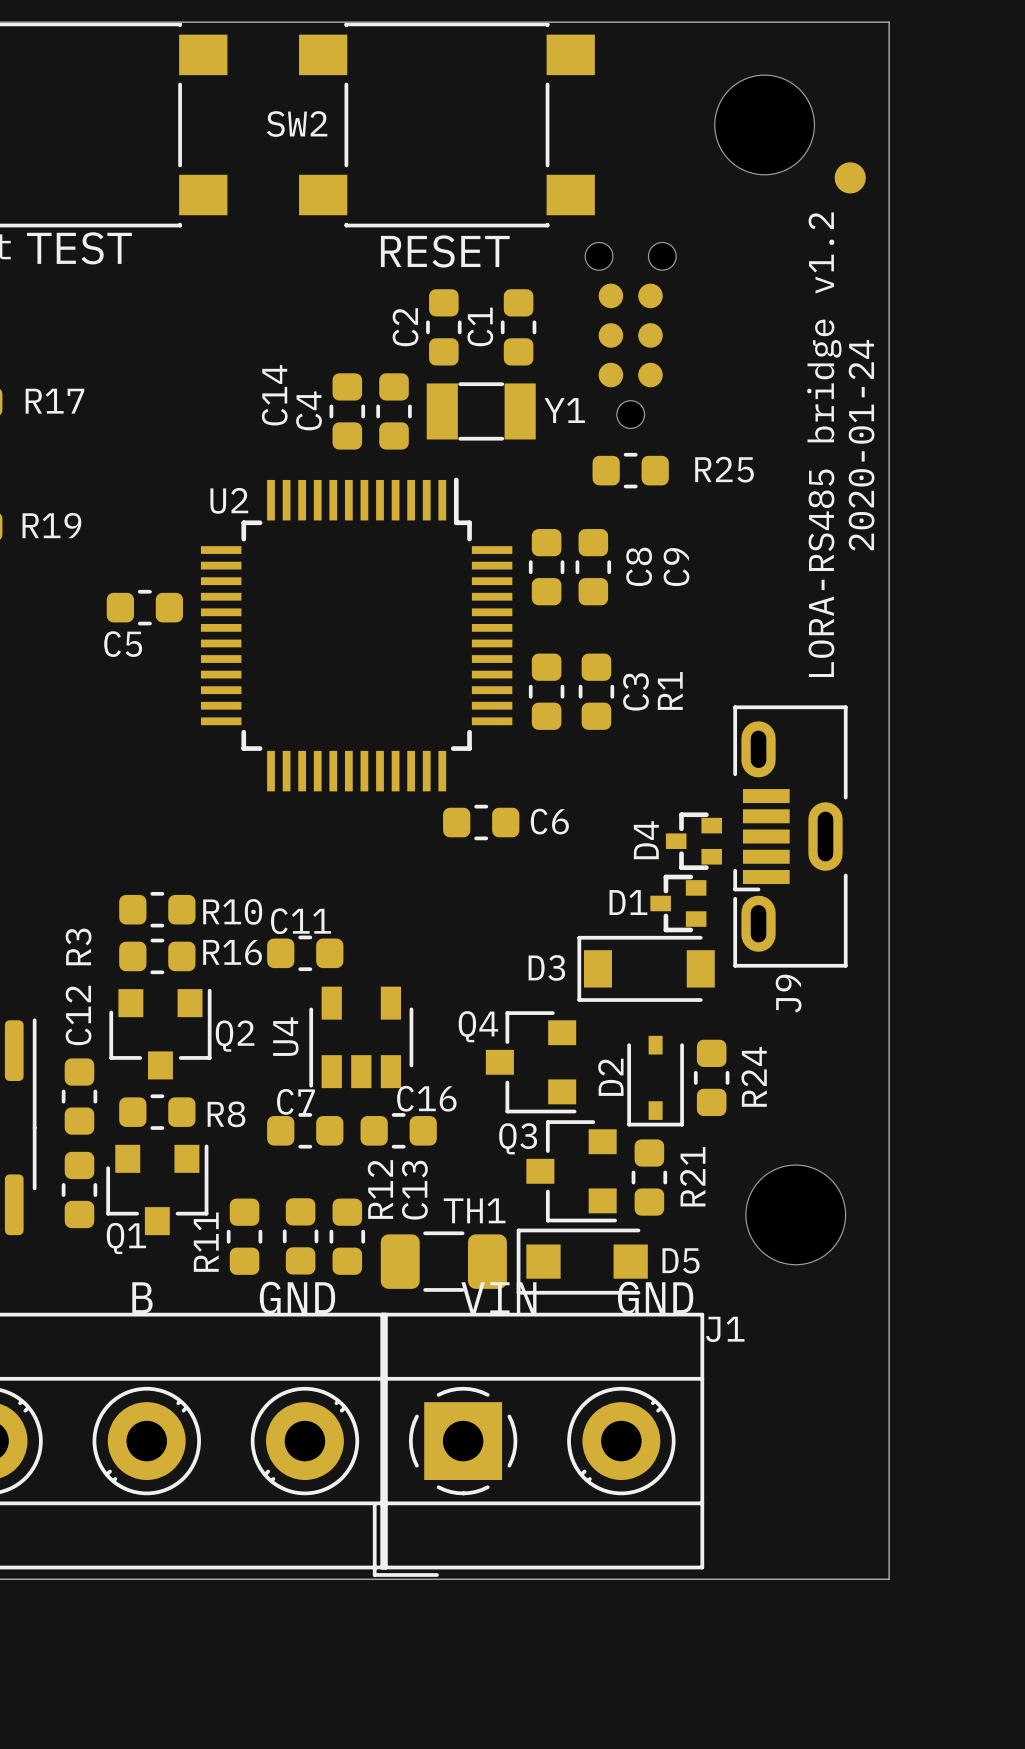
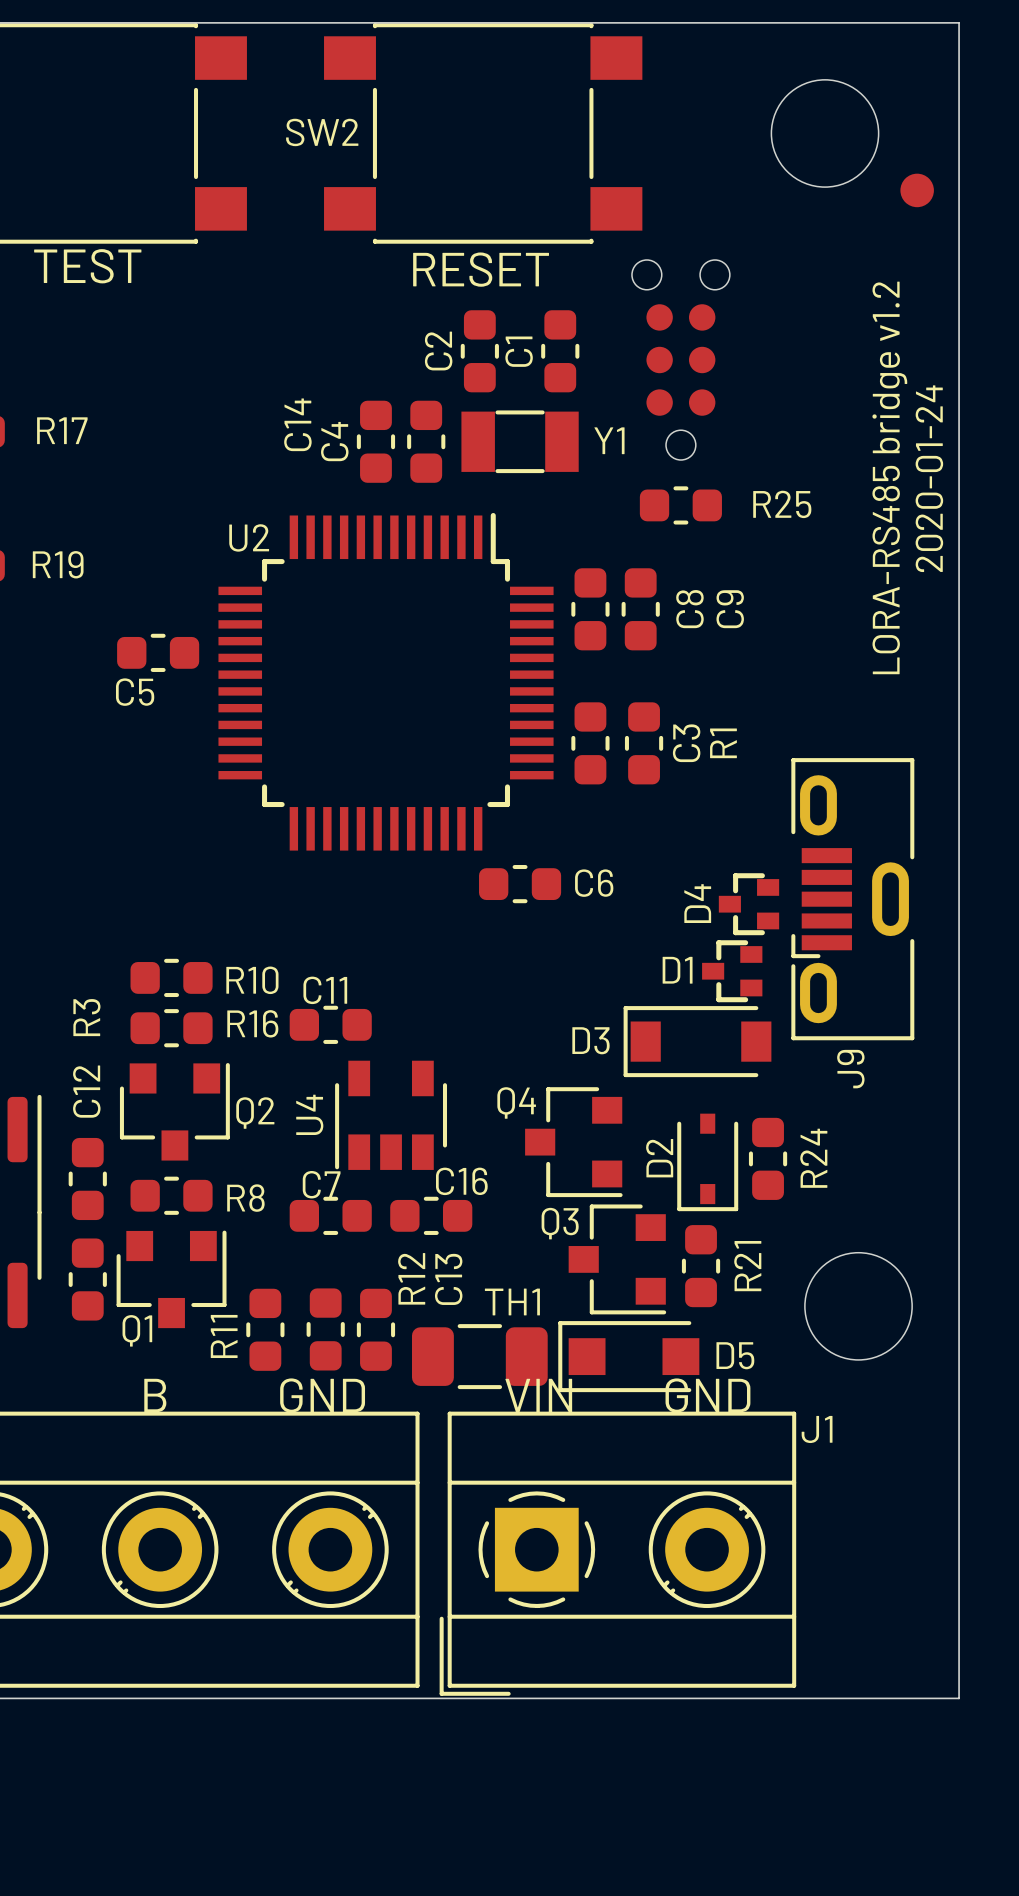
J1 position: (538, 1444) -> (617, 1553)

